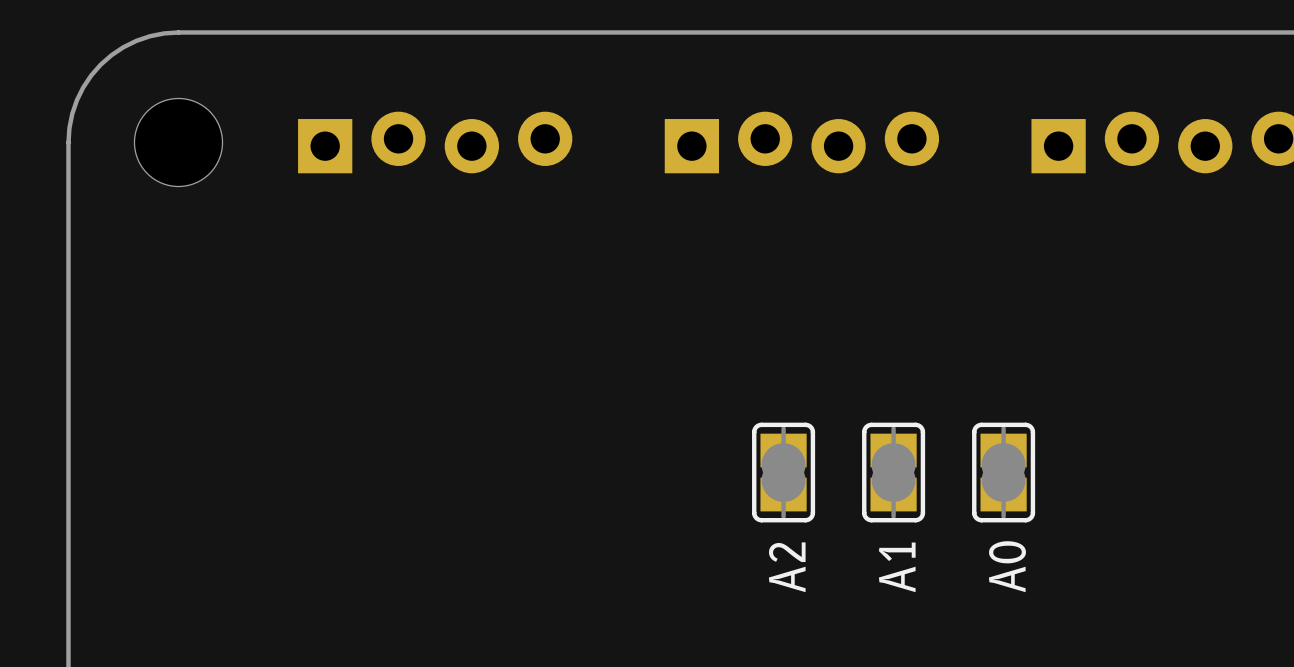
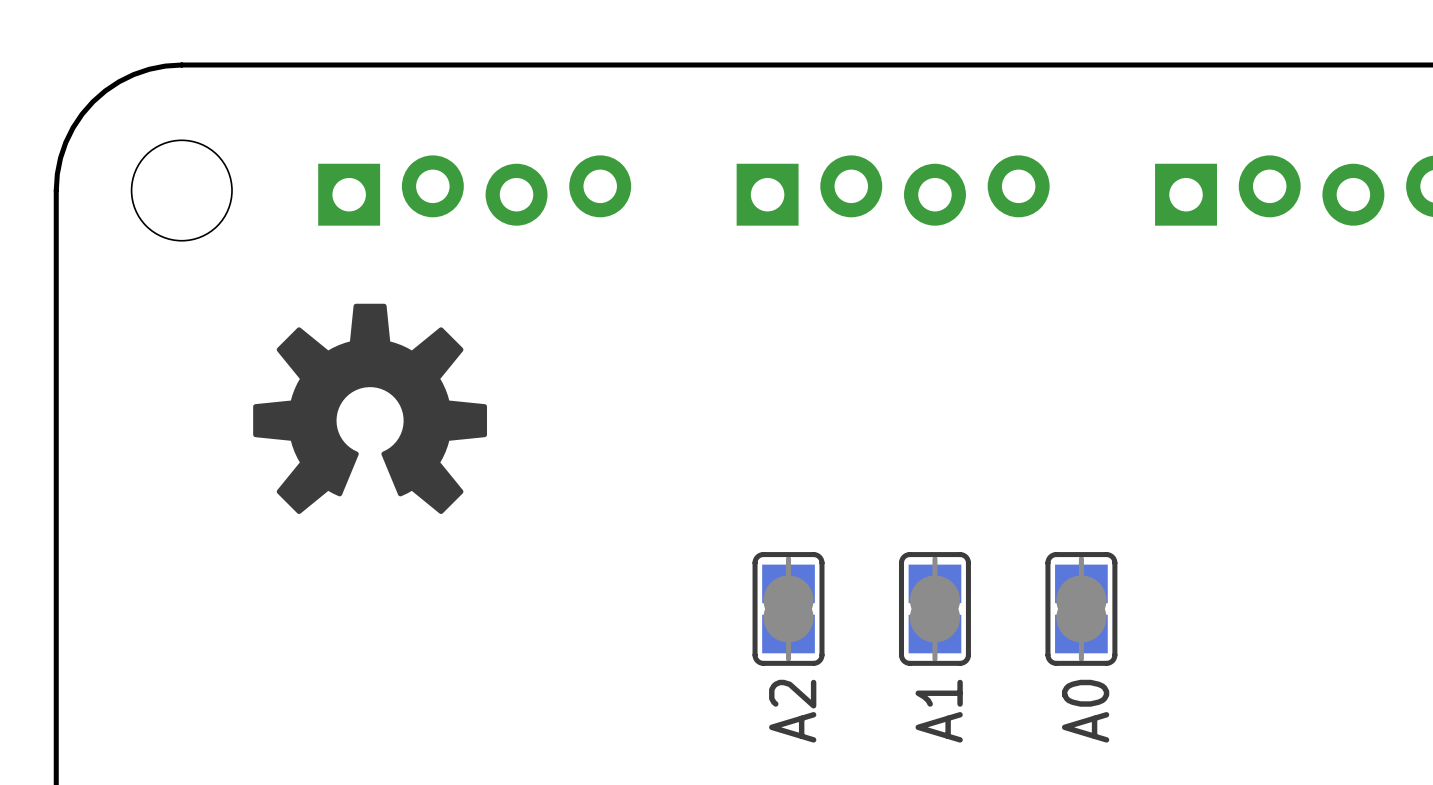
drawing: none -> [253, 303, 488, 515]
A2 position: (783, 472) -> (788, 608)
A1 position: (893, 472) -> (934, 608)
A0 position: (1003, 472) -> (1081, 608)

